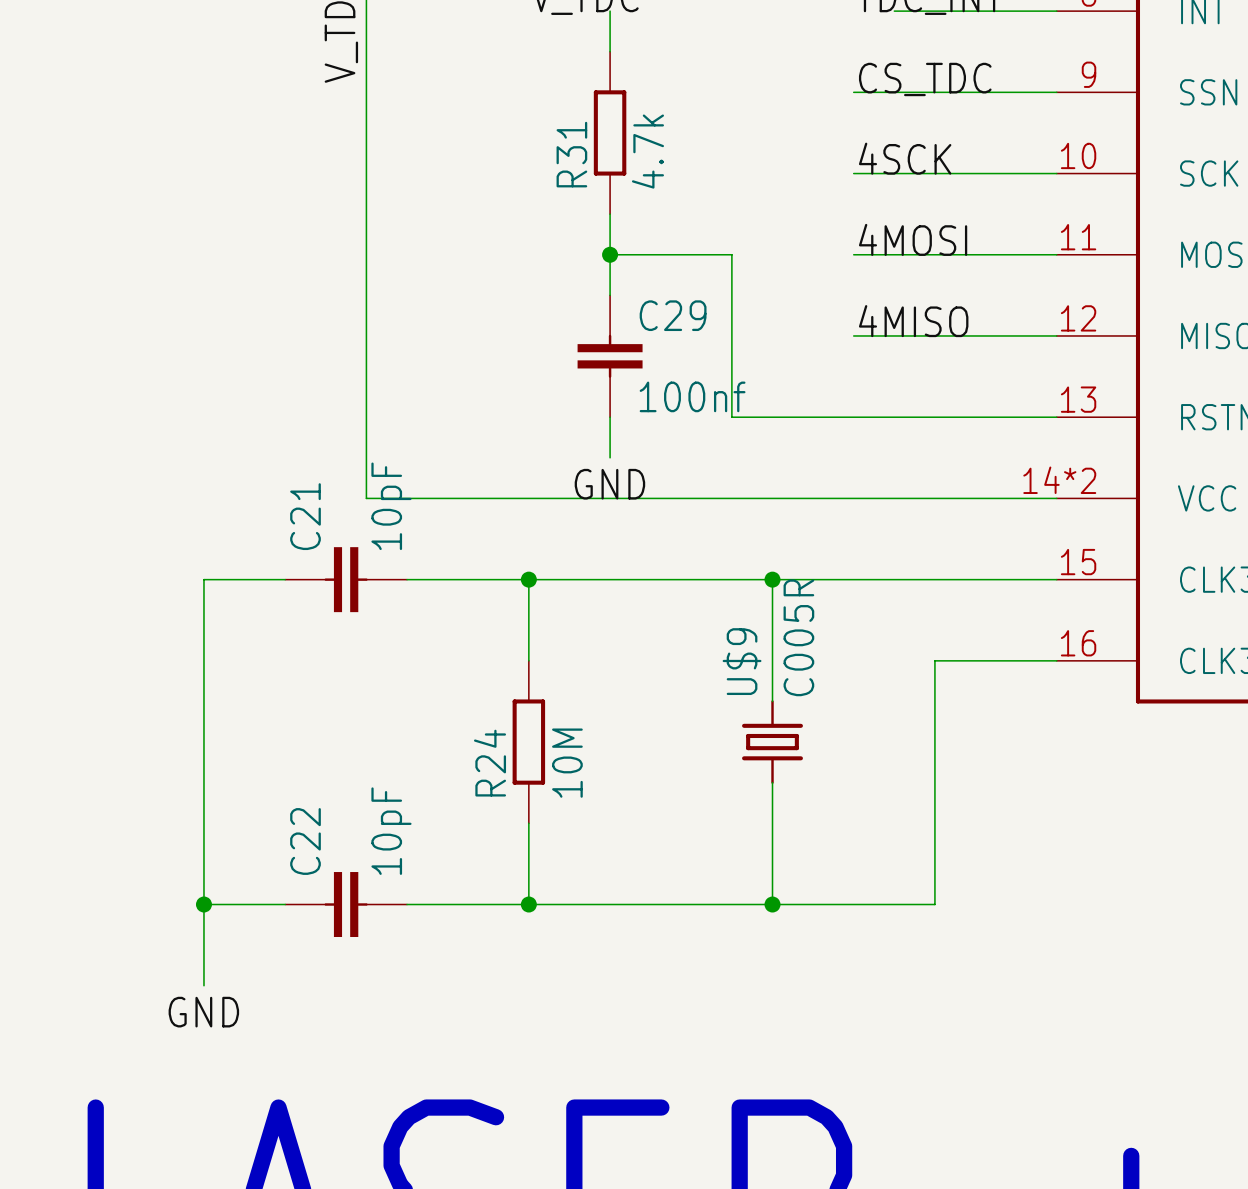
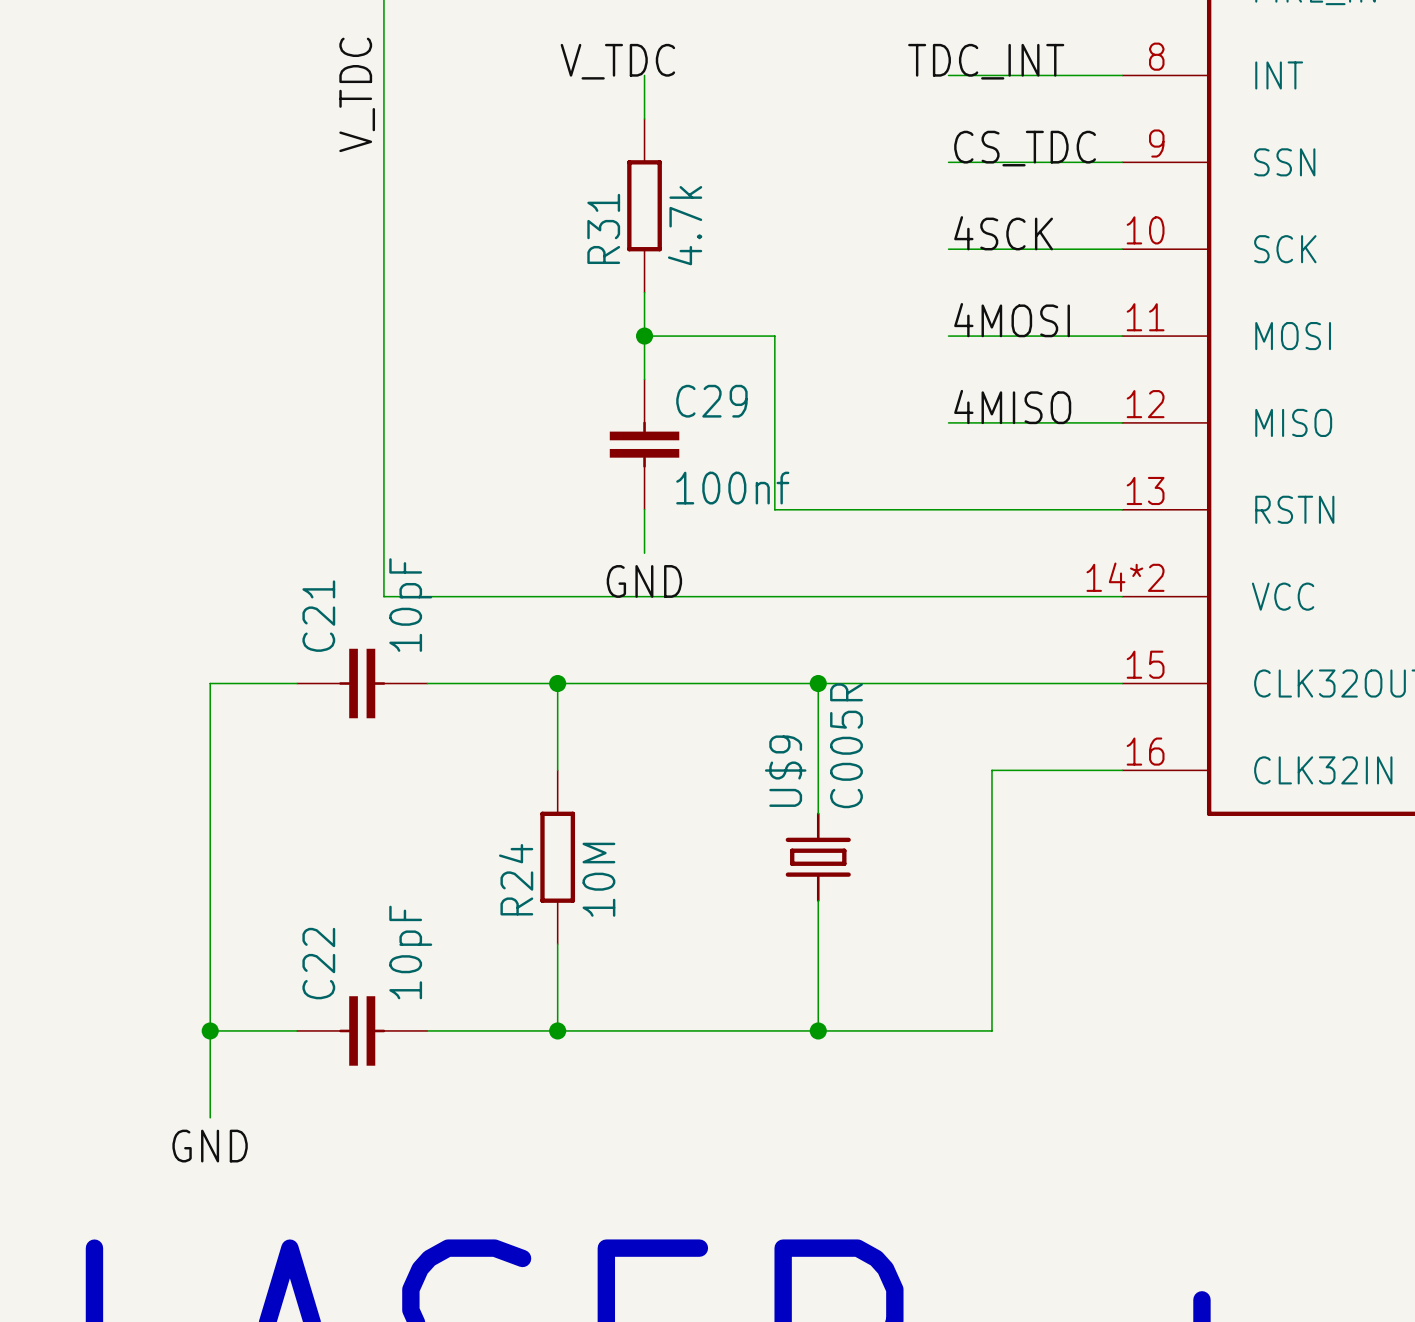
label position: CS_TDC (925, 79) -> CS_TDC (1025, 148)
wire: (853, 92) (894, 92) -> none
label position: 4SCK (905, 158) -> 4SCK (1003, 233)
wire: (853, 173) (894, 173) -> none
label position: 4MOSI (913, 239) -> 4MOSI (1012, 320)
wire: (853, 254) (894, 254) -> none
label position: 4MISO (913, 321) -> 4MISO (1012, 407)
wire: (853, 335) (894, 335) -> none

